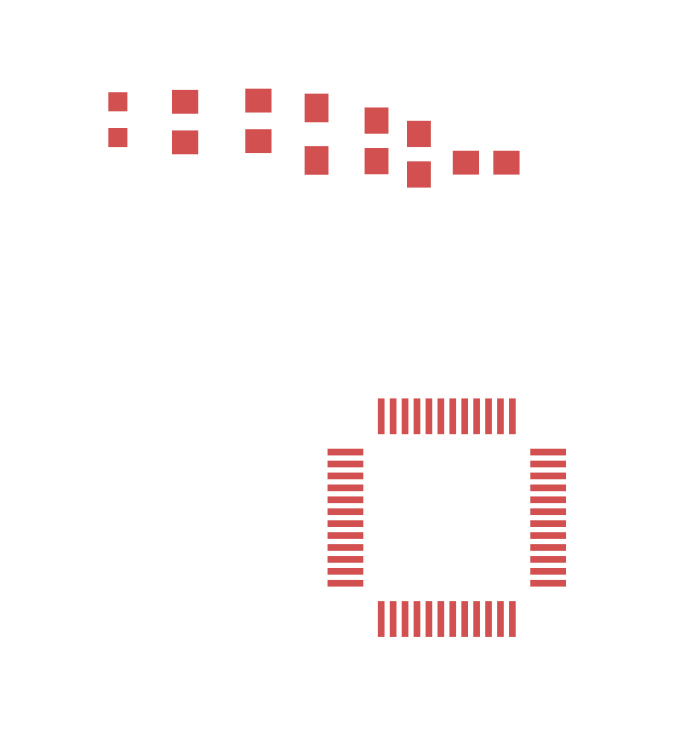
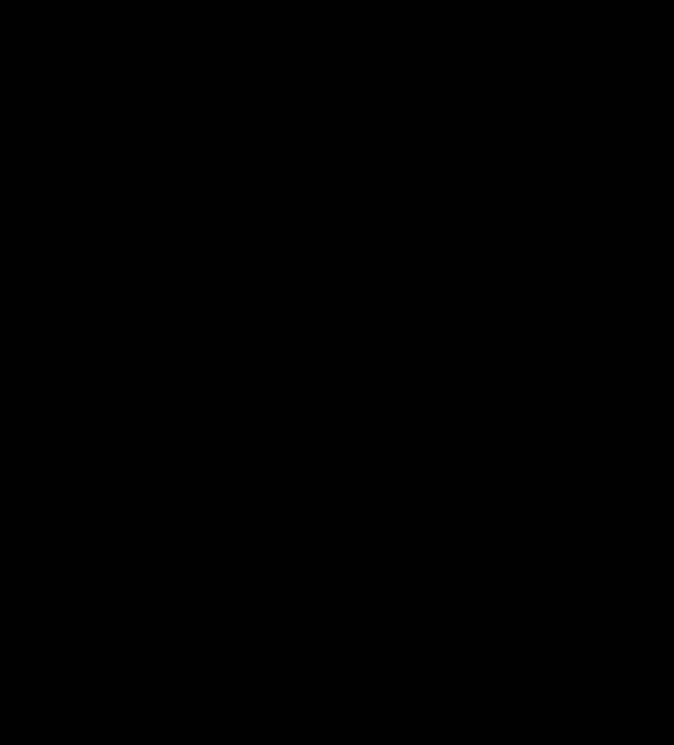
part: (117, 119) -> none
part: (258, 120) -> none
part: (185, 122) -> none
part: (316, 134) -> none
part: (376, 140) -> none
part: (418, 154) -> none
part: (486, 162) -> none
part: (446, 517) -> none

